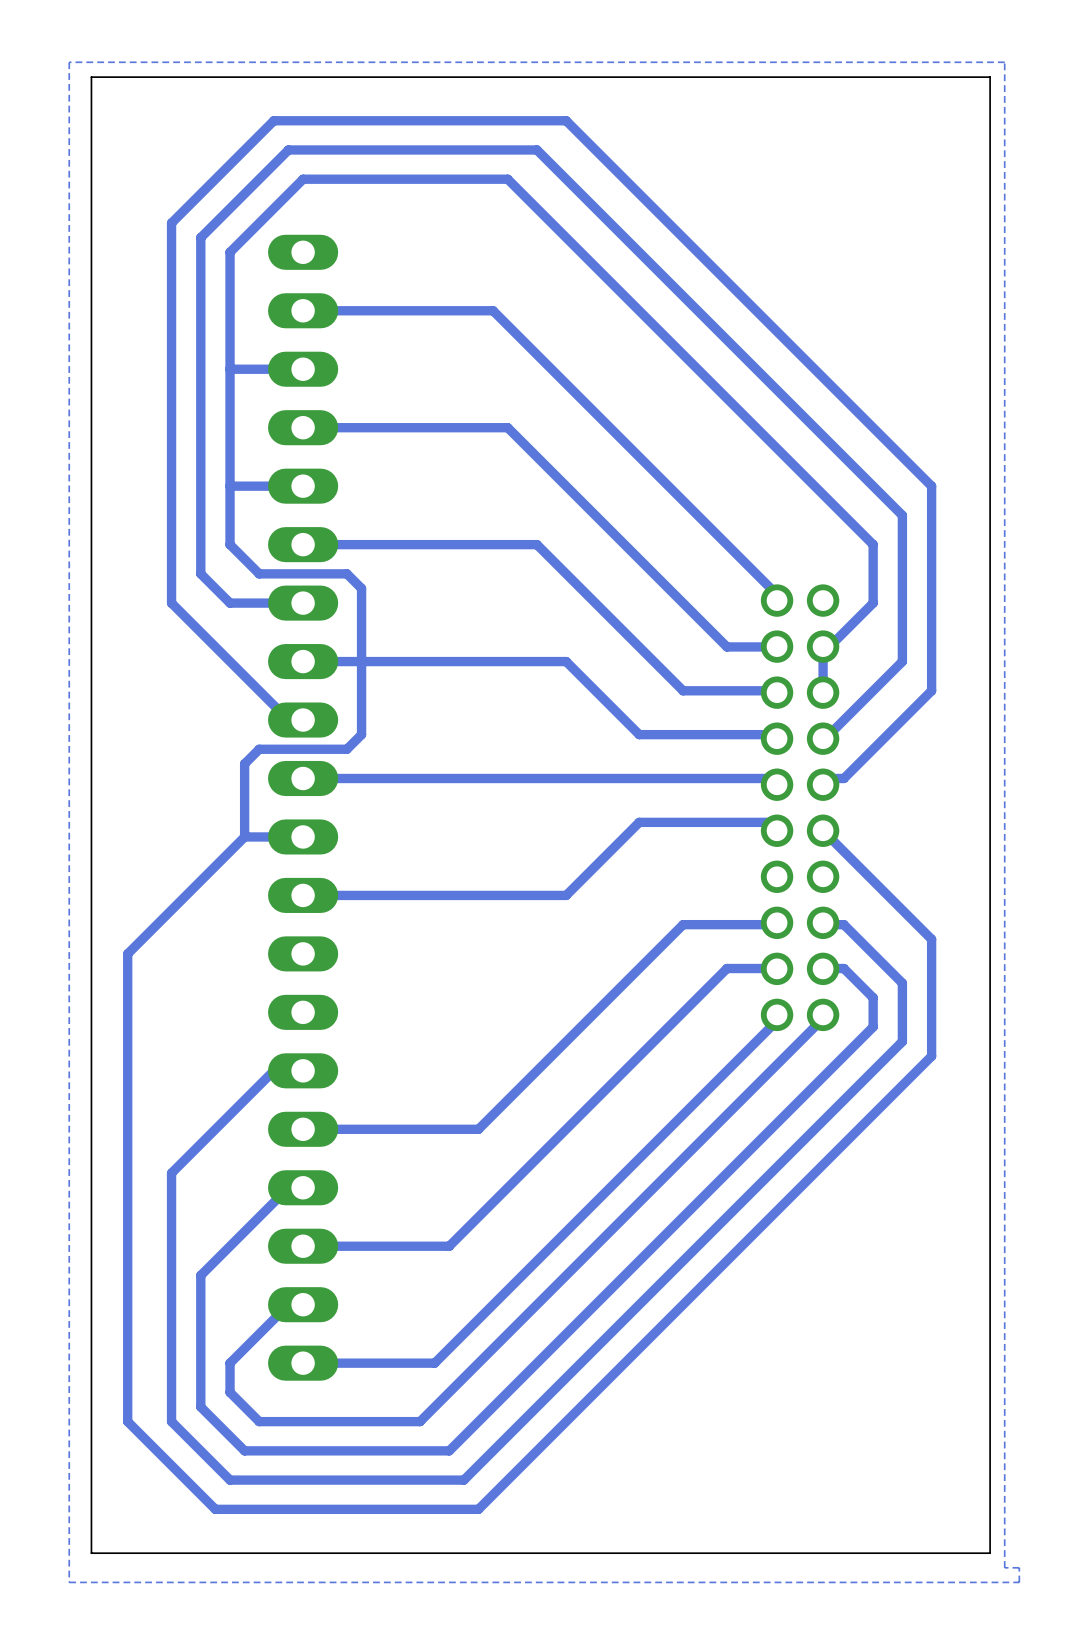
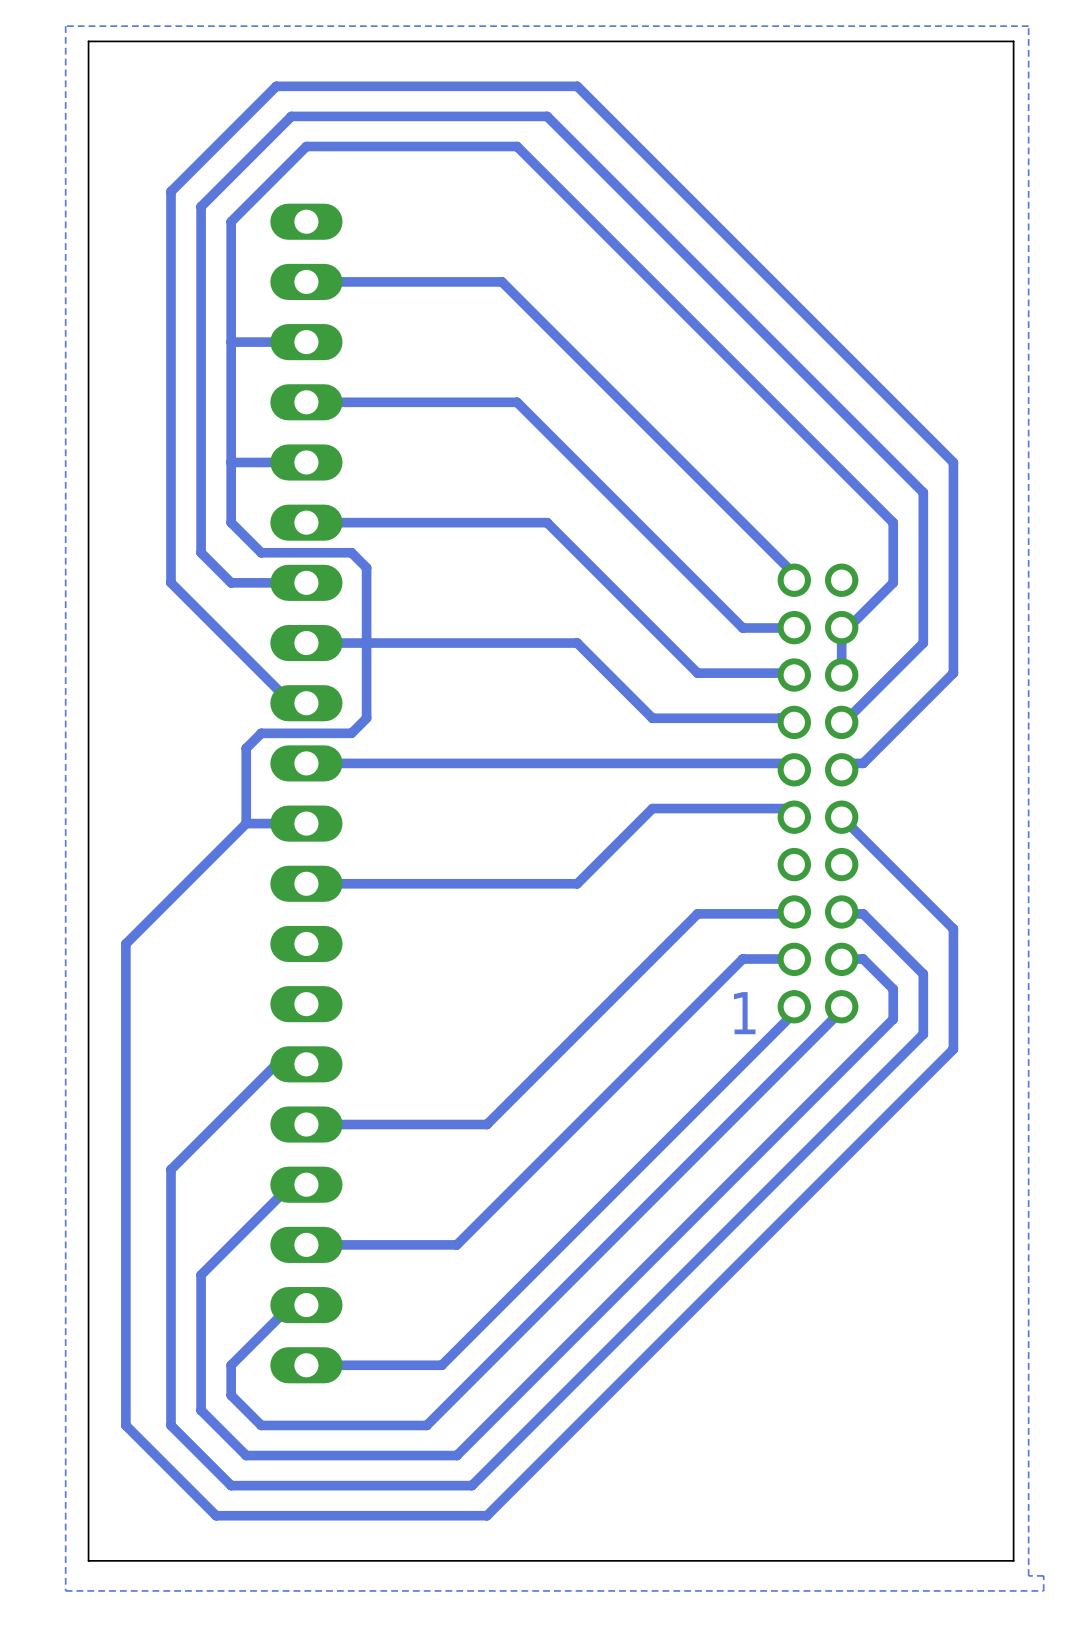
text: none -> 1 (744, 1013)

